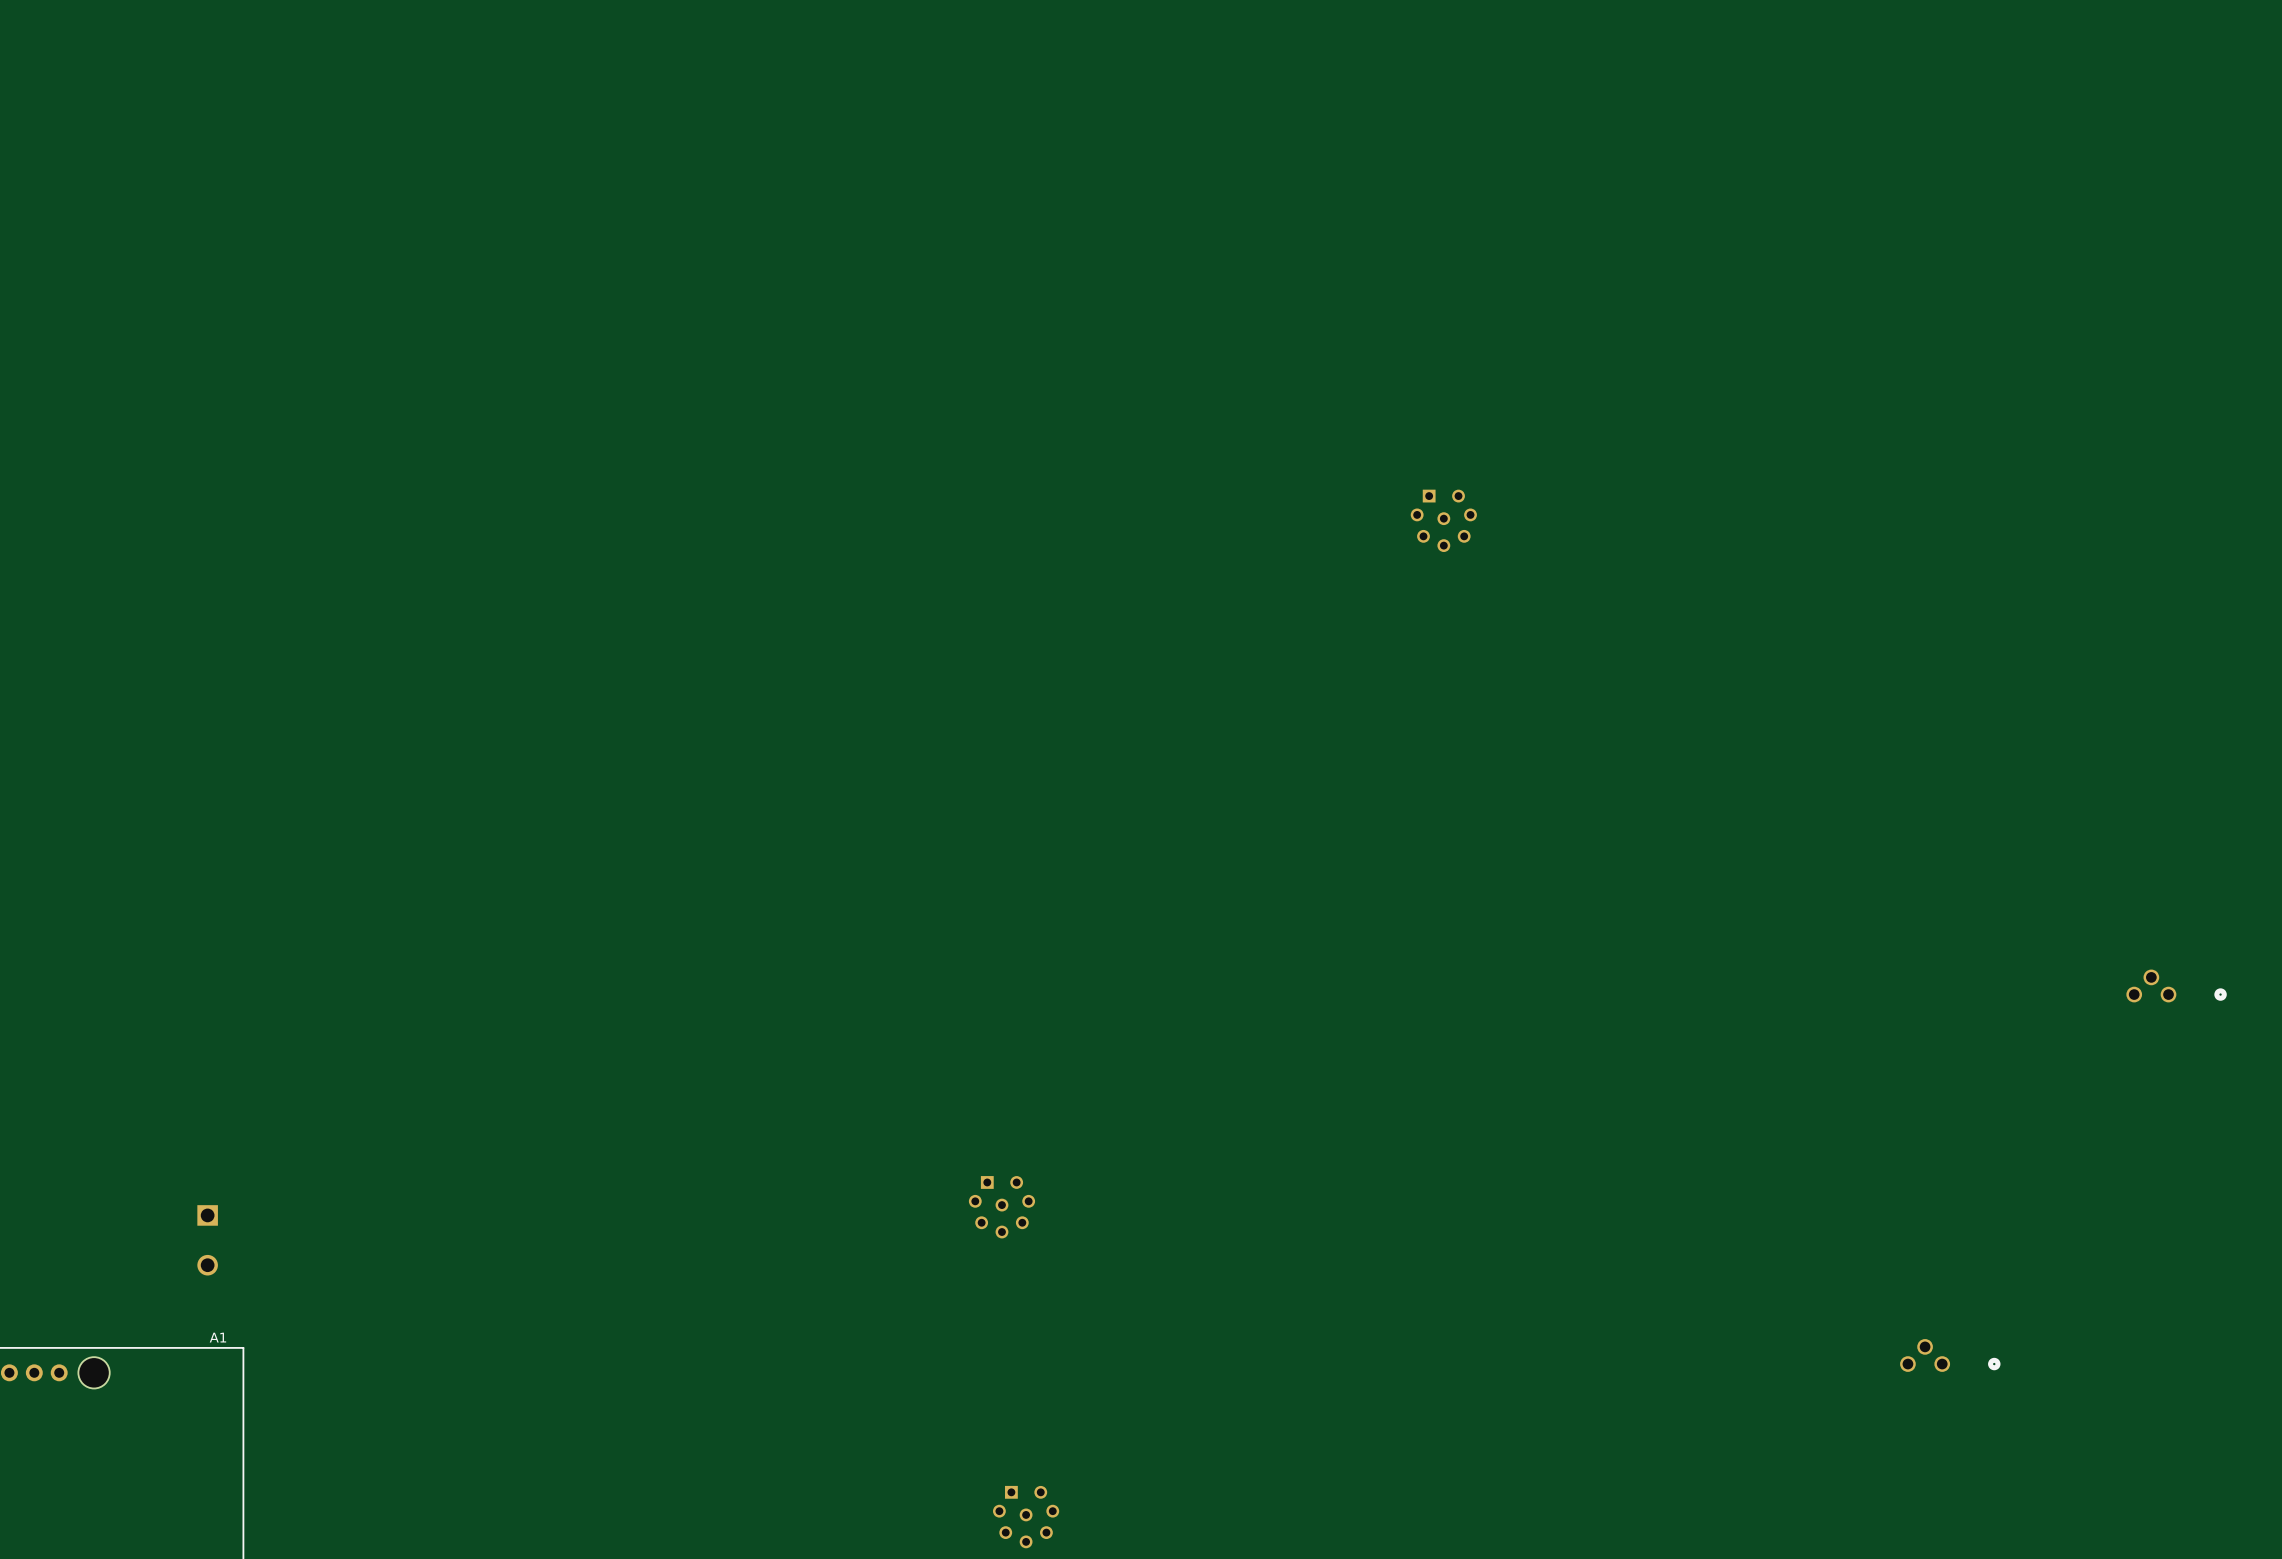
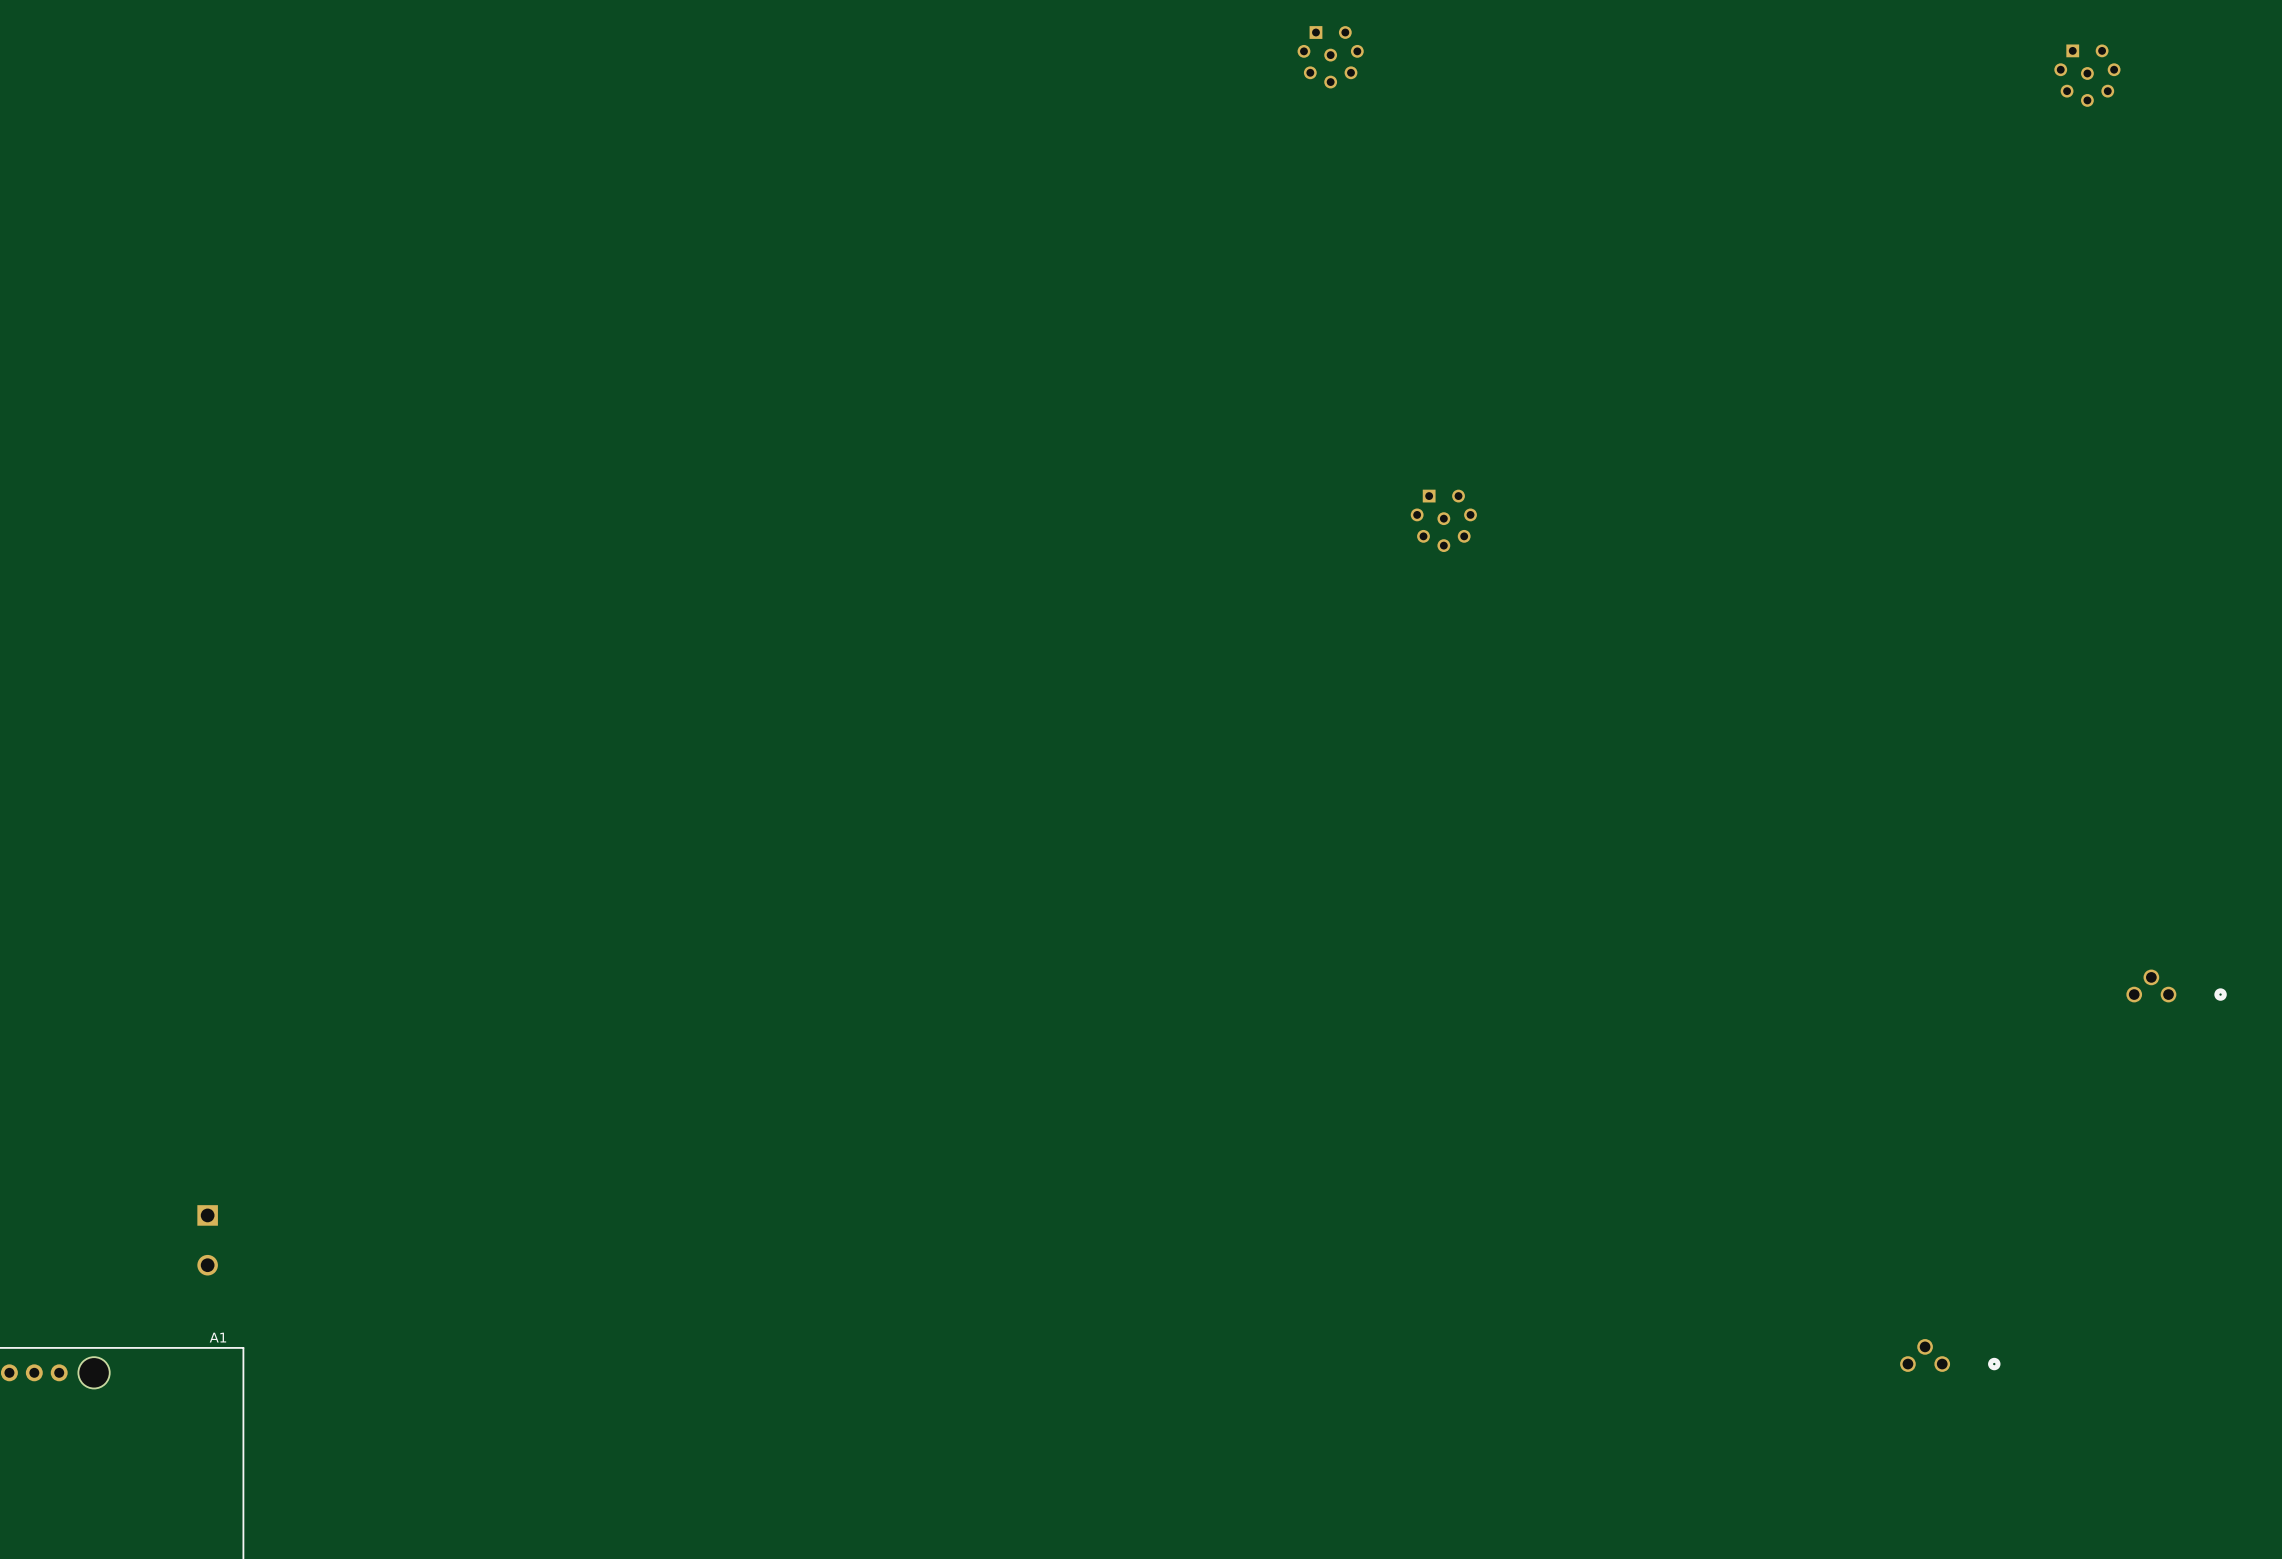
part: none -> (1330, 57)
part: none -> (2087, 75)
part: (1001, 1207) -> none
part: (1026, 1517) -> none

